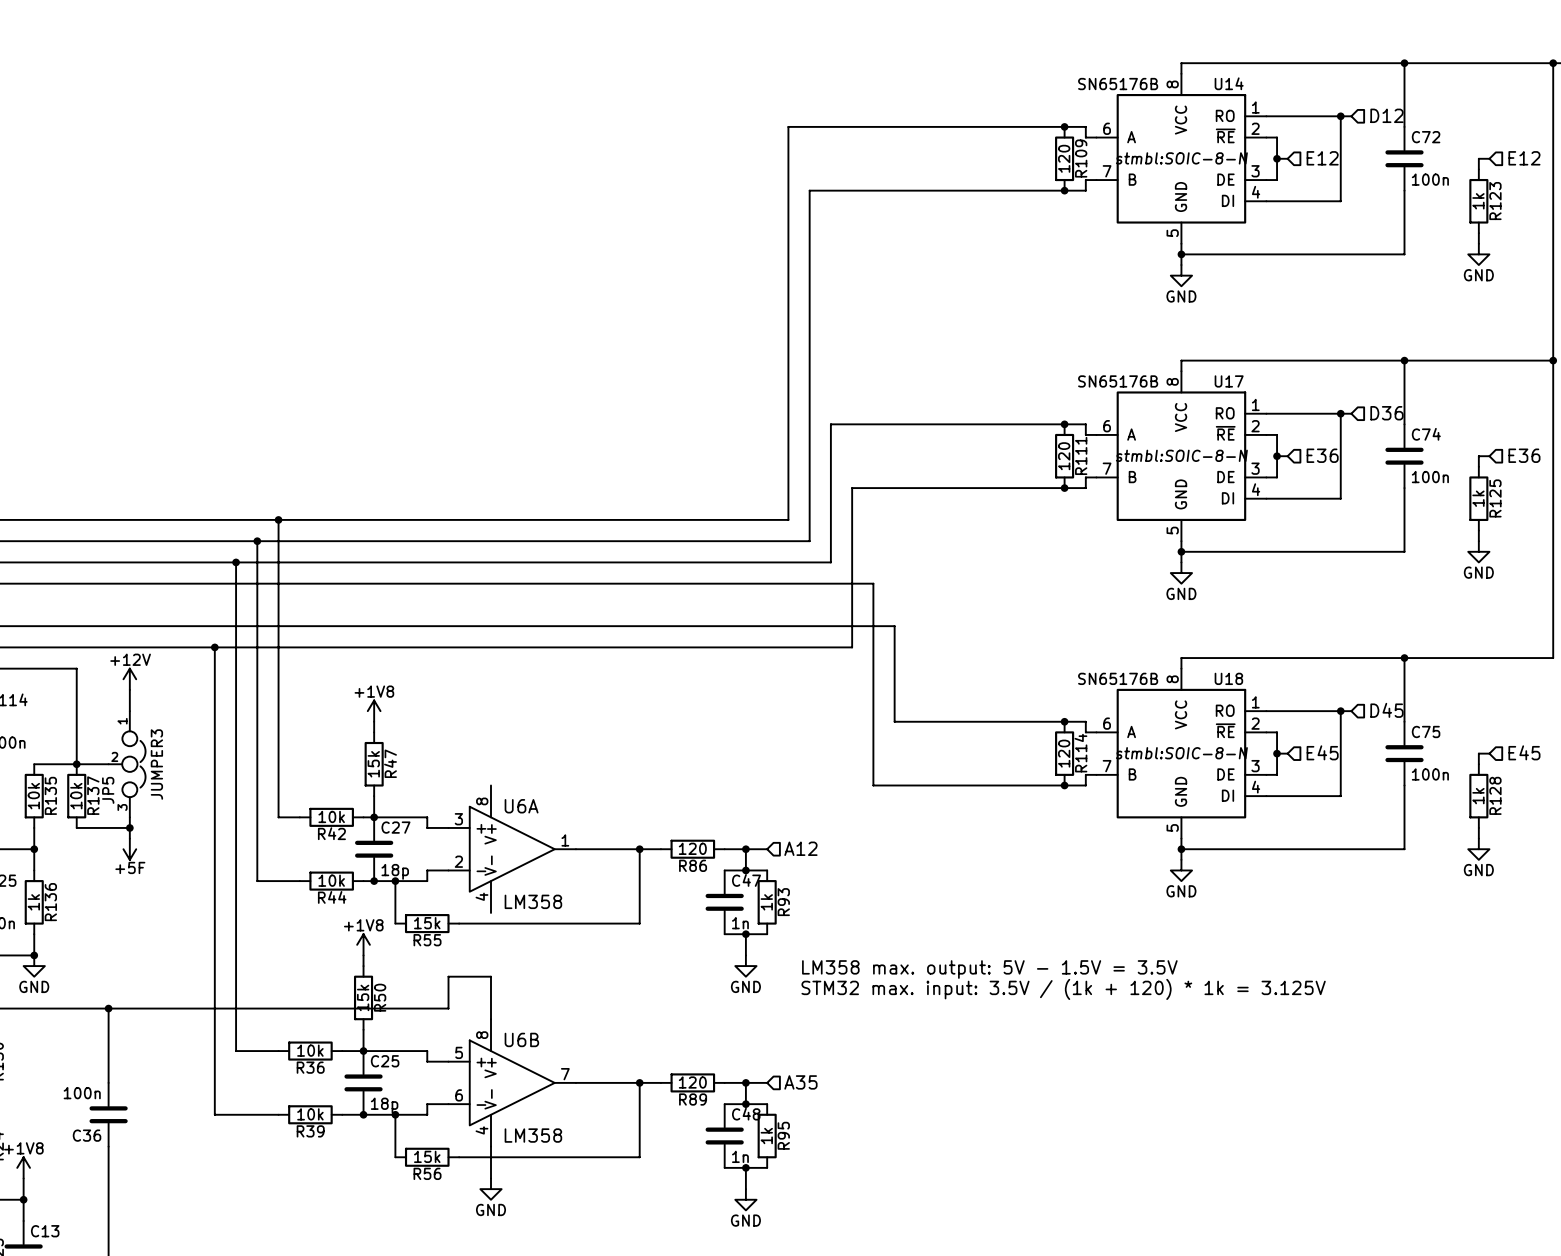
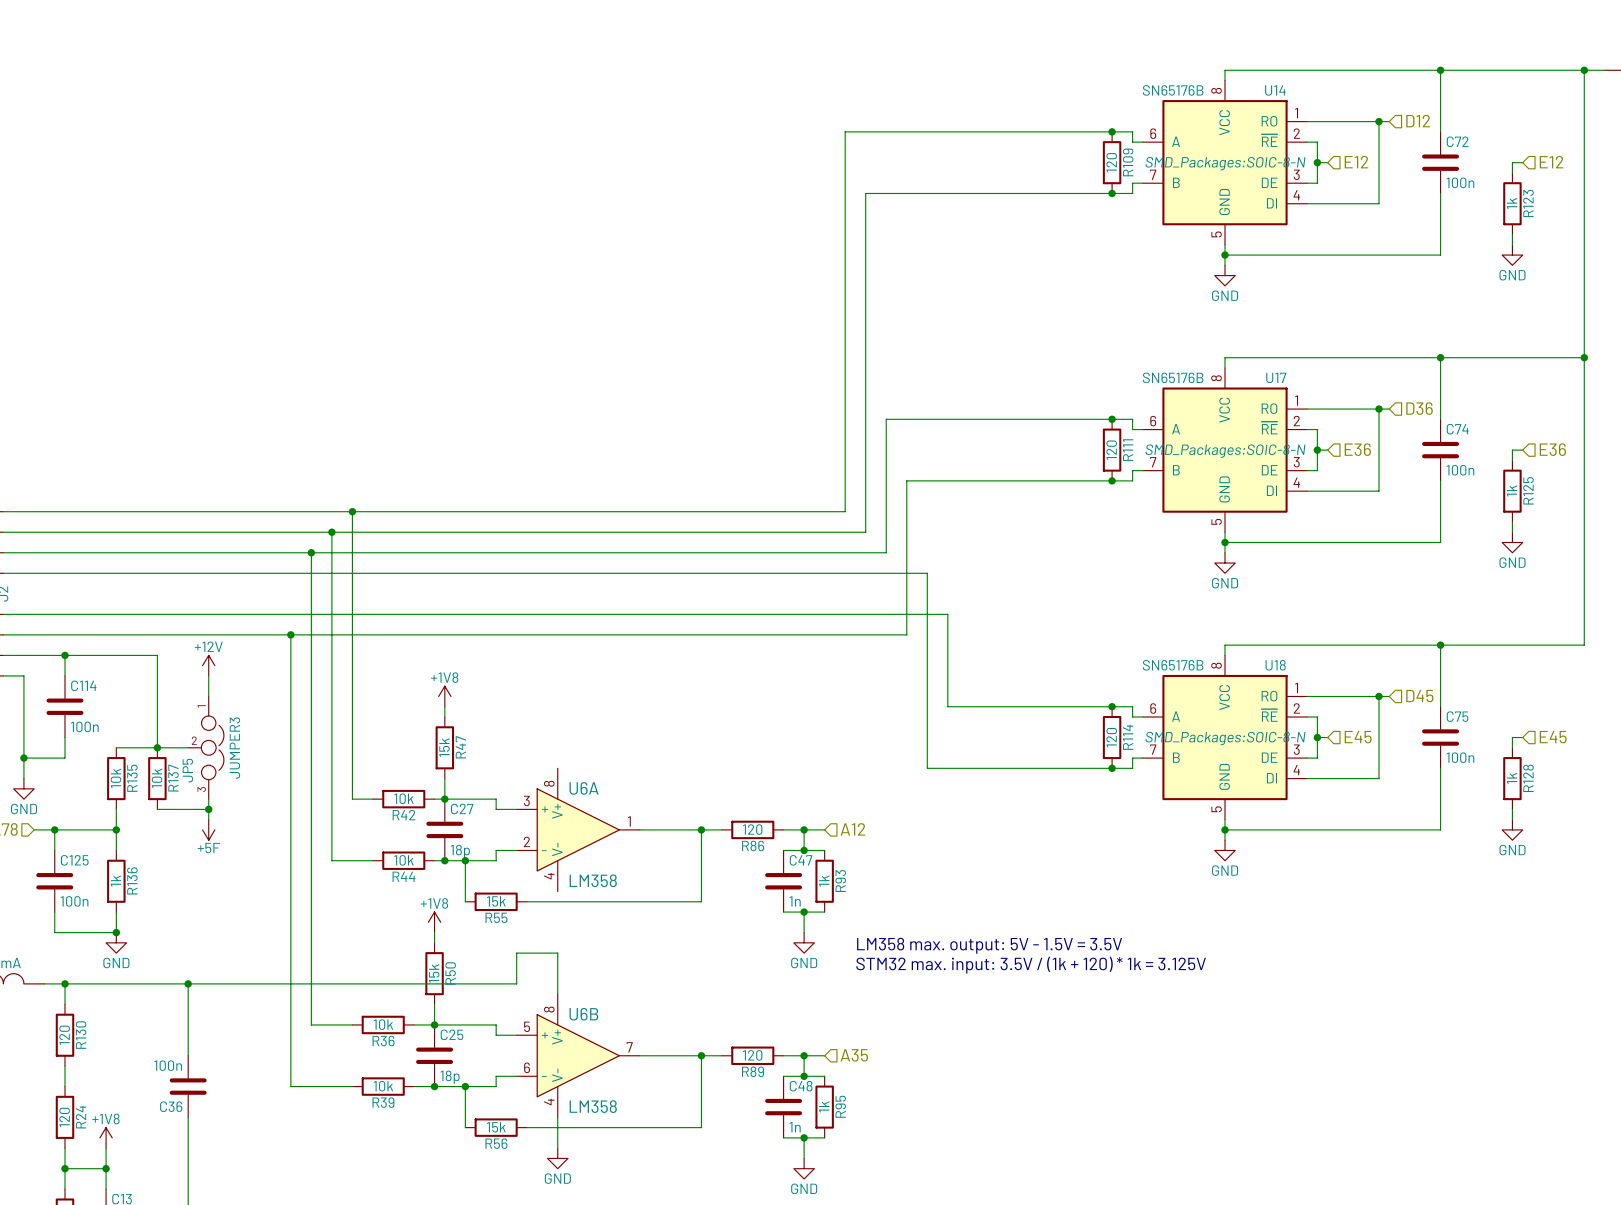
U14 text: stmbl:SOIC-8-N (1181, 158) -> SMD_Packages:SOIC-8-N (1225, 163)
U17 text: stmbl:SOIC-8-N (1181, 455) -> SMD_Packages:SOIC-8-N (1225, 451)
U18 text: stmbl:SOIC-8-N (1181, 753) -> SMD_Packages:SOIC-8-N (1225, 738)

